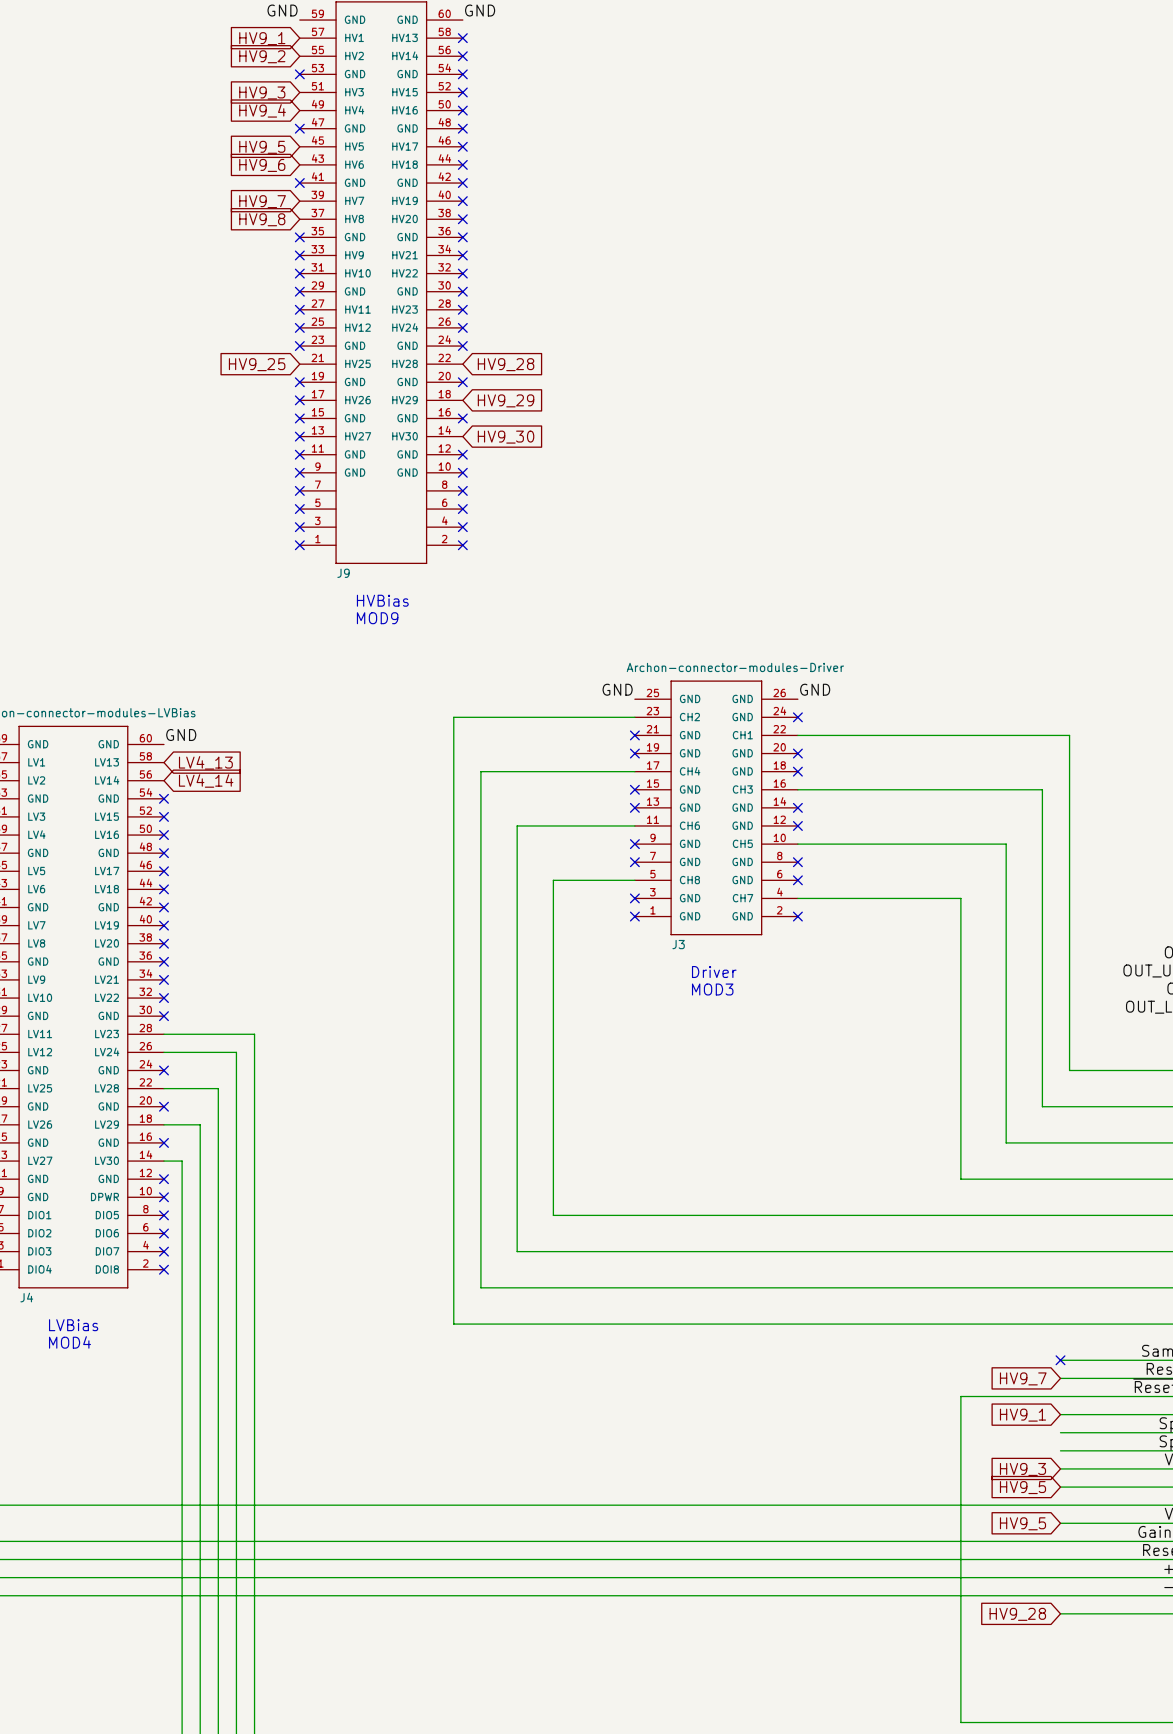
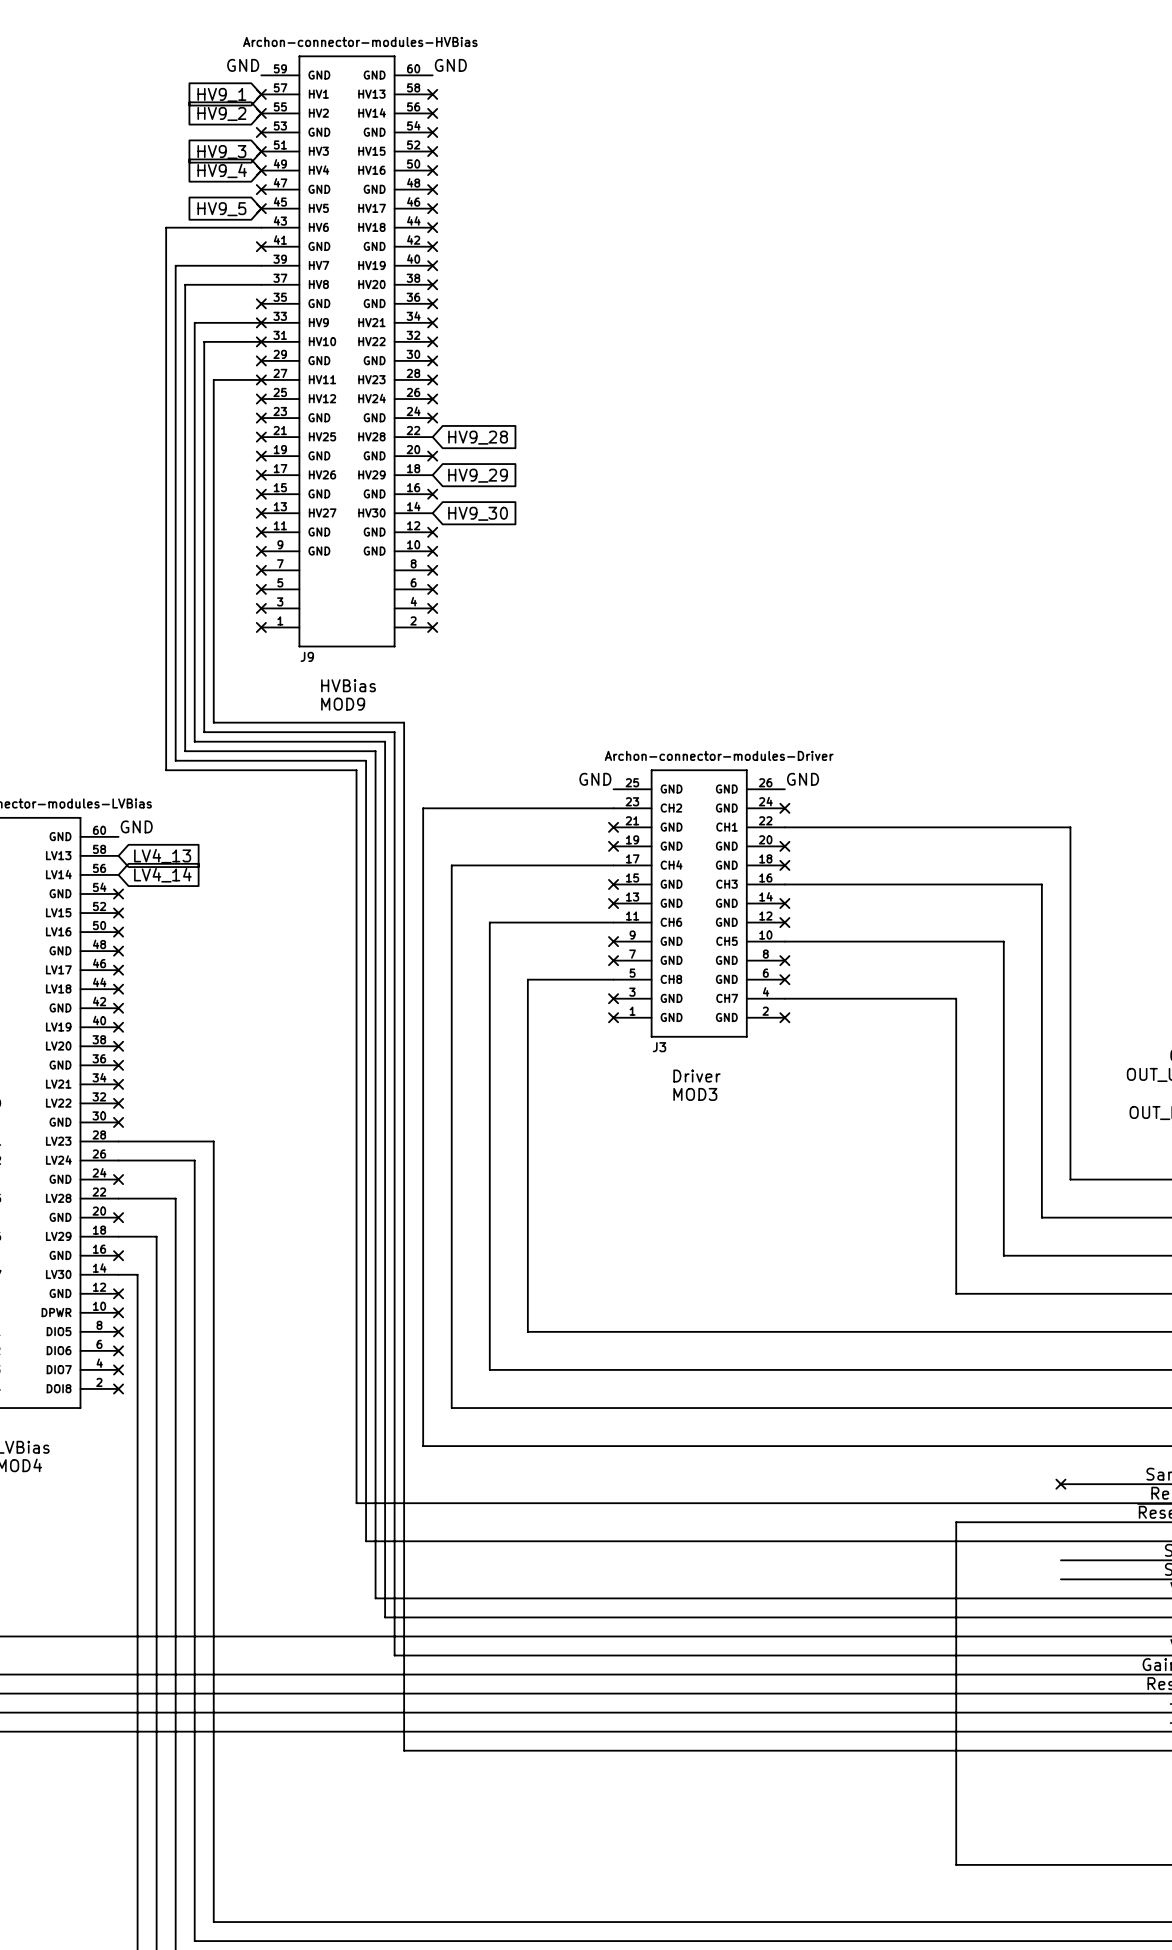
no-connect mark: none -> (261, 94)
no-connect mark: none -> (261, 113)
no-connect mark: none -> (261, 151)
no-connect mark: none -> (261, 170)
no-connect mark: none -> (261, 208)
wire: none -> (261, 227) (166, 227) (166, 770) (356, 770) (356, 1503) (1060, 1503)
global label: HV9_6 (262, 165) -> none
global label: HV9_7 (262, 201) -> none
wire: none -> (261, 265) (175, 265) (175, 760) (366, 760) (366, 1541) (1060, 1541)
global label: HV9_8 (262, 219) -> none
wire: none -> (261, 284) (185, 284) (185, 751) (375, 751) (375, 1598) (1060, 1598)
wire: none -> (261, 322) (194, 322) (194, 741) (385, 741) (385, 1617) (1060, 1617)
wire: none -> (261, 341) (204, 341) (204, 732) (394, 732) (394, 1655) (1060, 1655)
wire: none -> (261, 379) (213, 379) (213, 722) (404, 722) (404, 1750) (1060, 1750)
global label: HV9_25 (257, 364) -> none
no-connect mark: none -> (261, 437)
global label: HV9_7 (1023, 1378) -> none
global label: HV9_1 (1022, 1415) -> none
global label: HV9_3 (1022, 1469) -> none
global label: HV9_5 (1022, 1487) -> none
global label: HV9_5 (1022, 1523) -> none
global label: HV9_28 (1017, 1614) -> none

